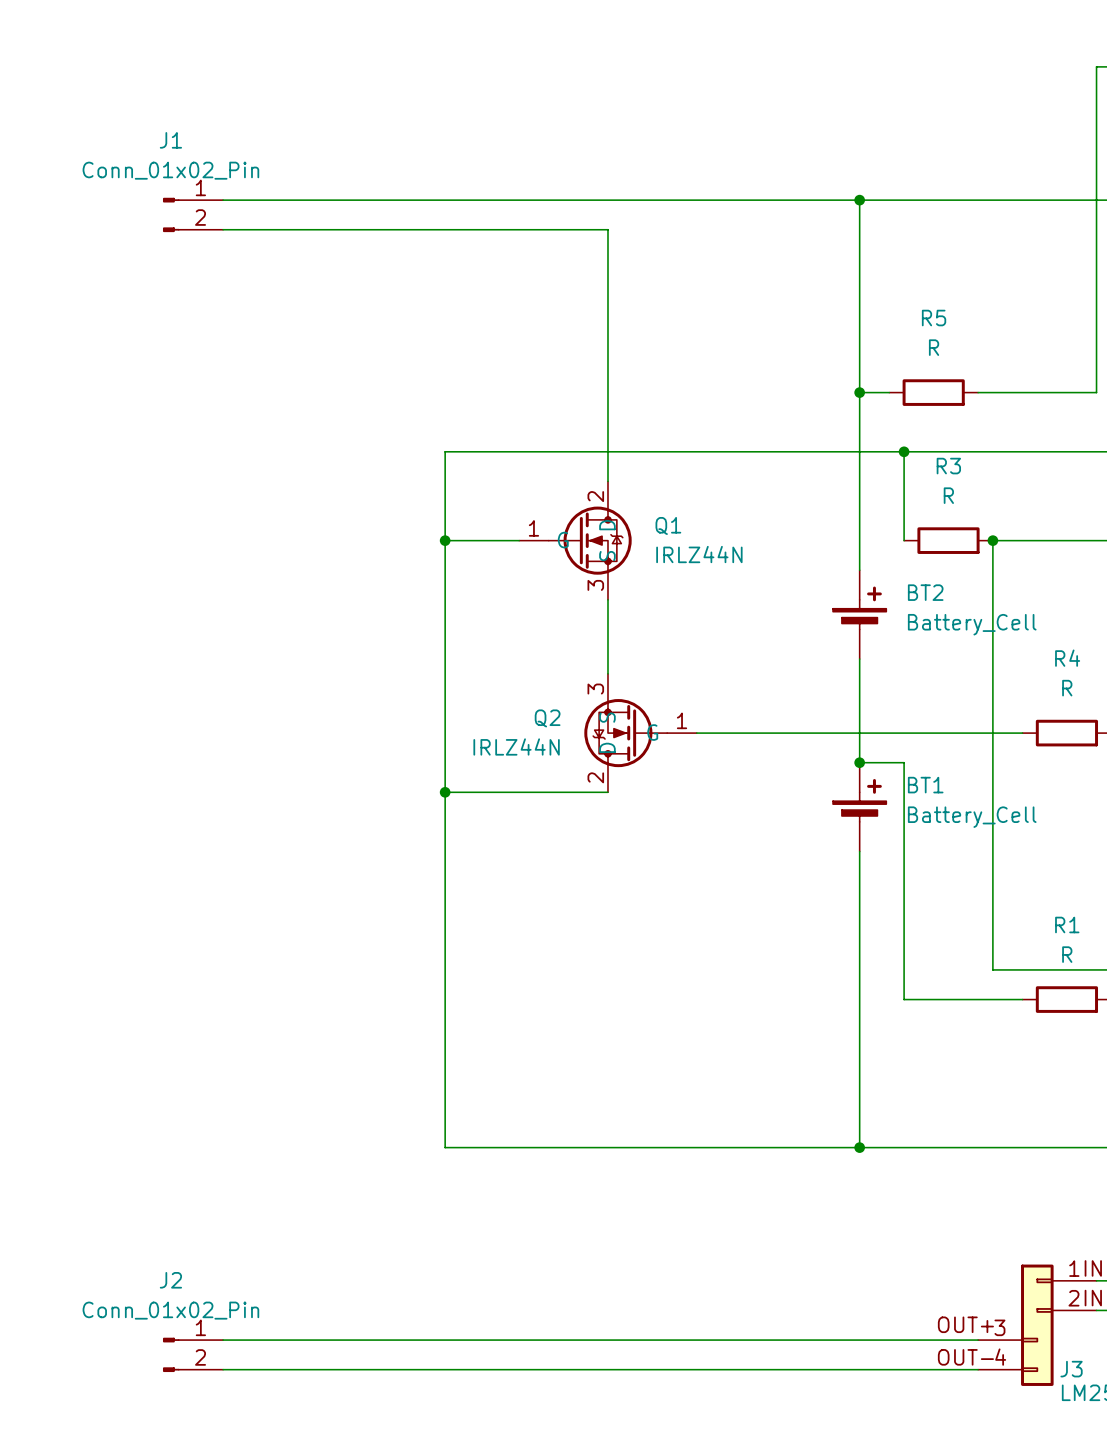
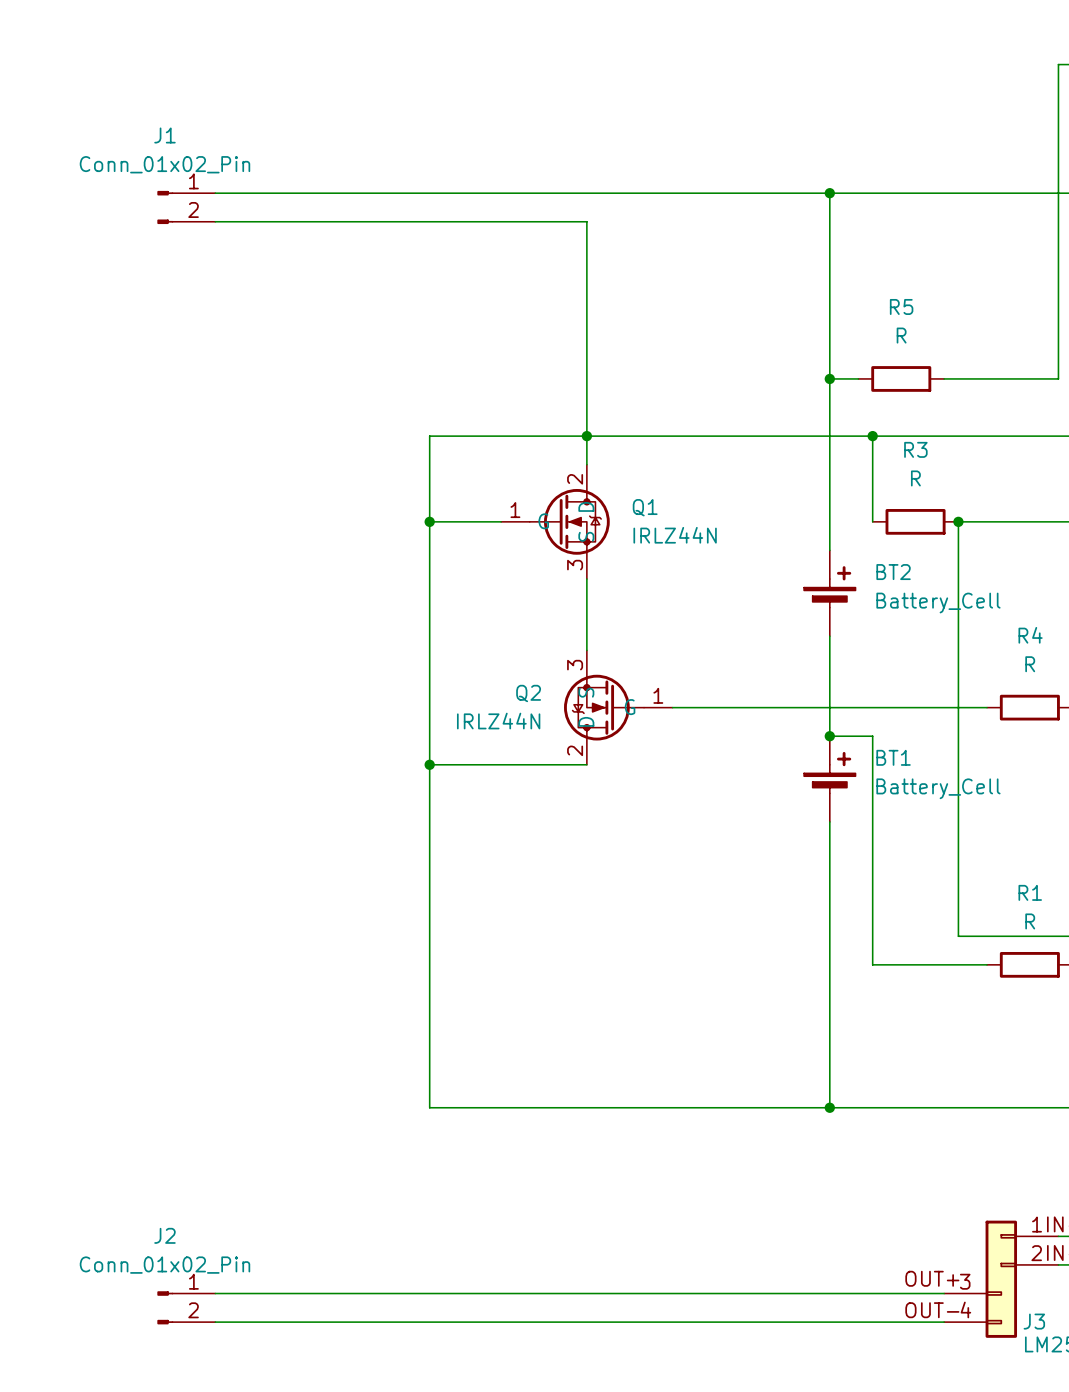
junction: none -> (586, 436)

